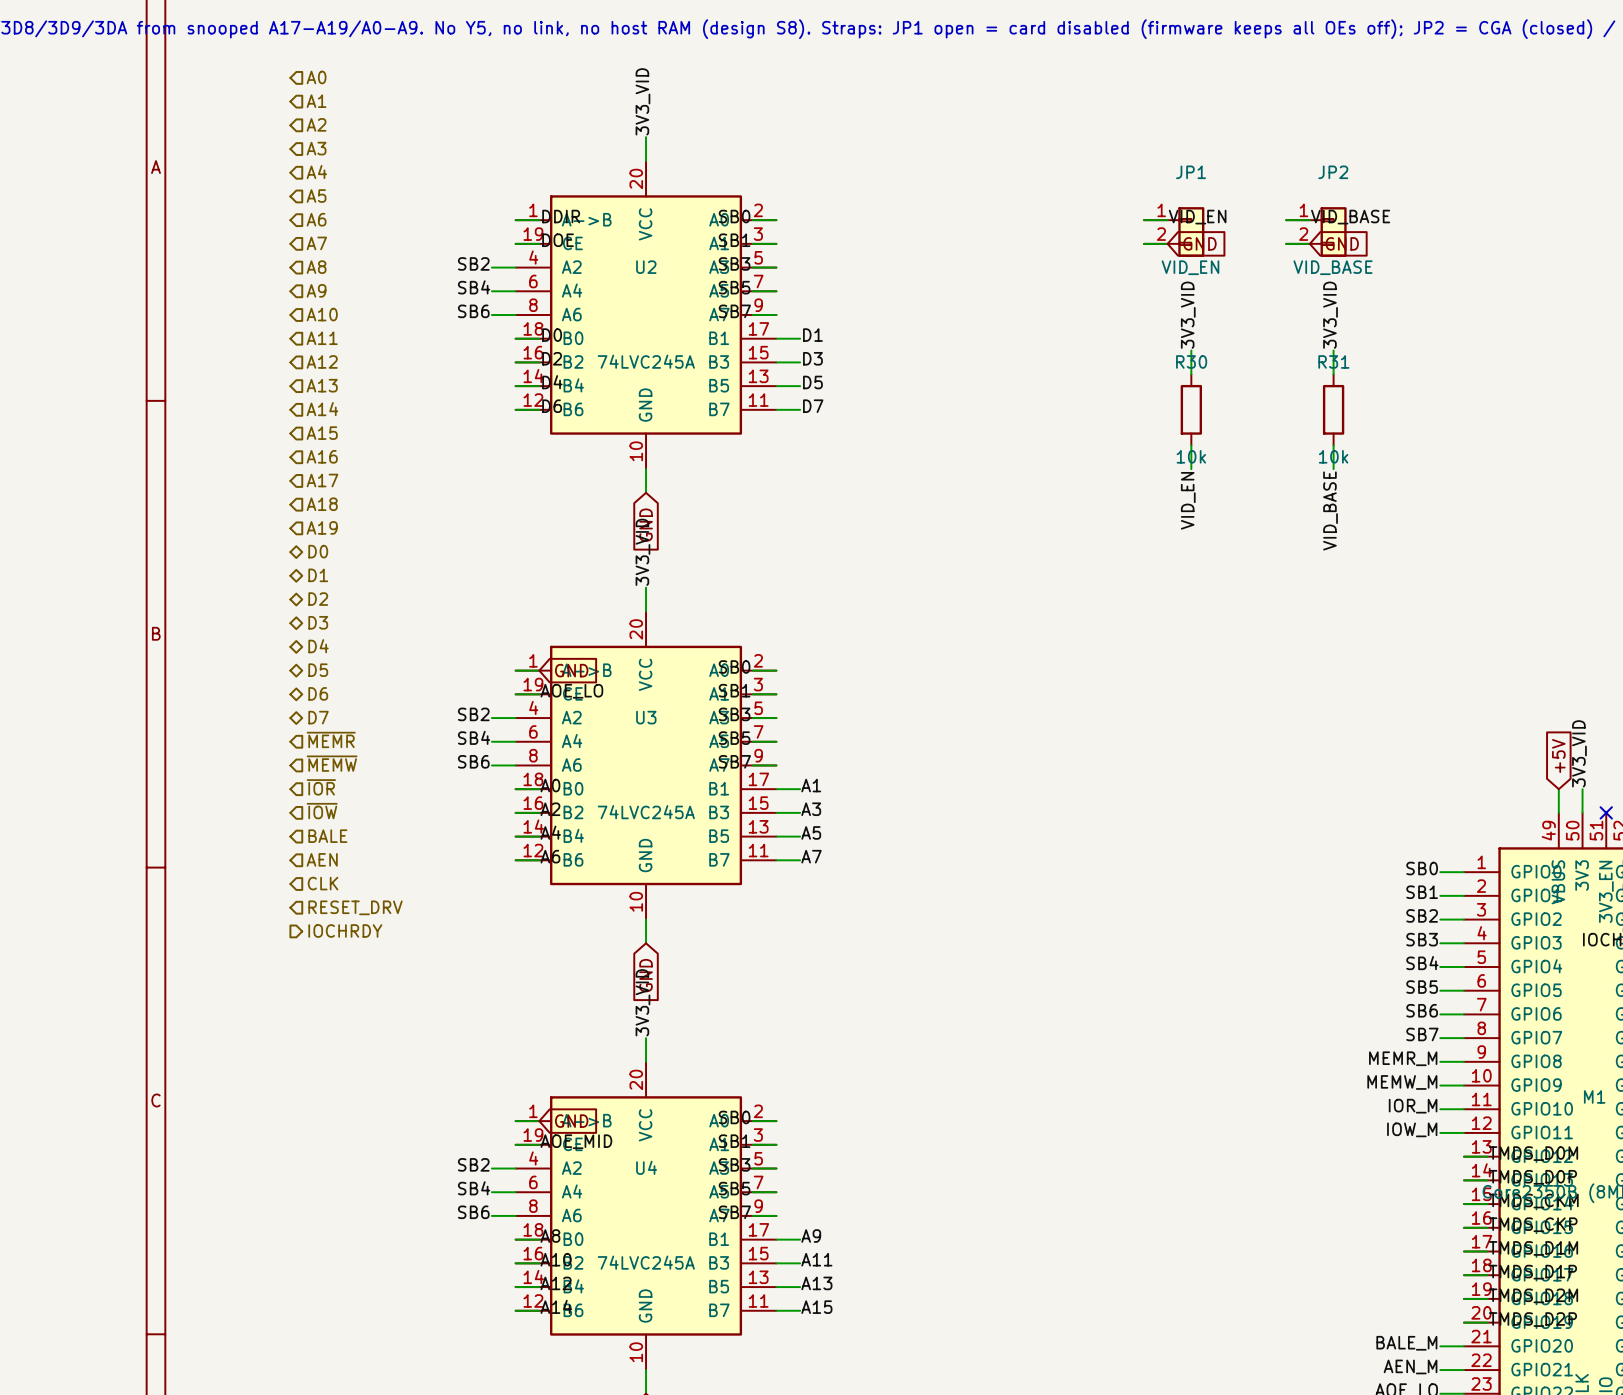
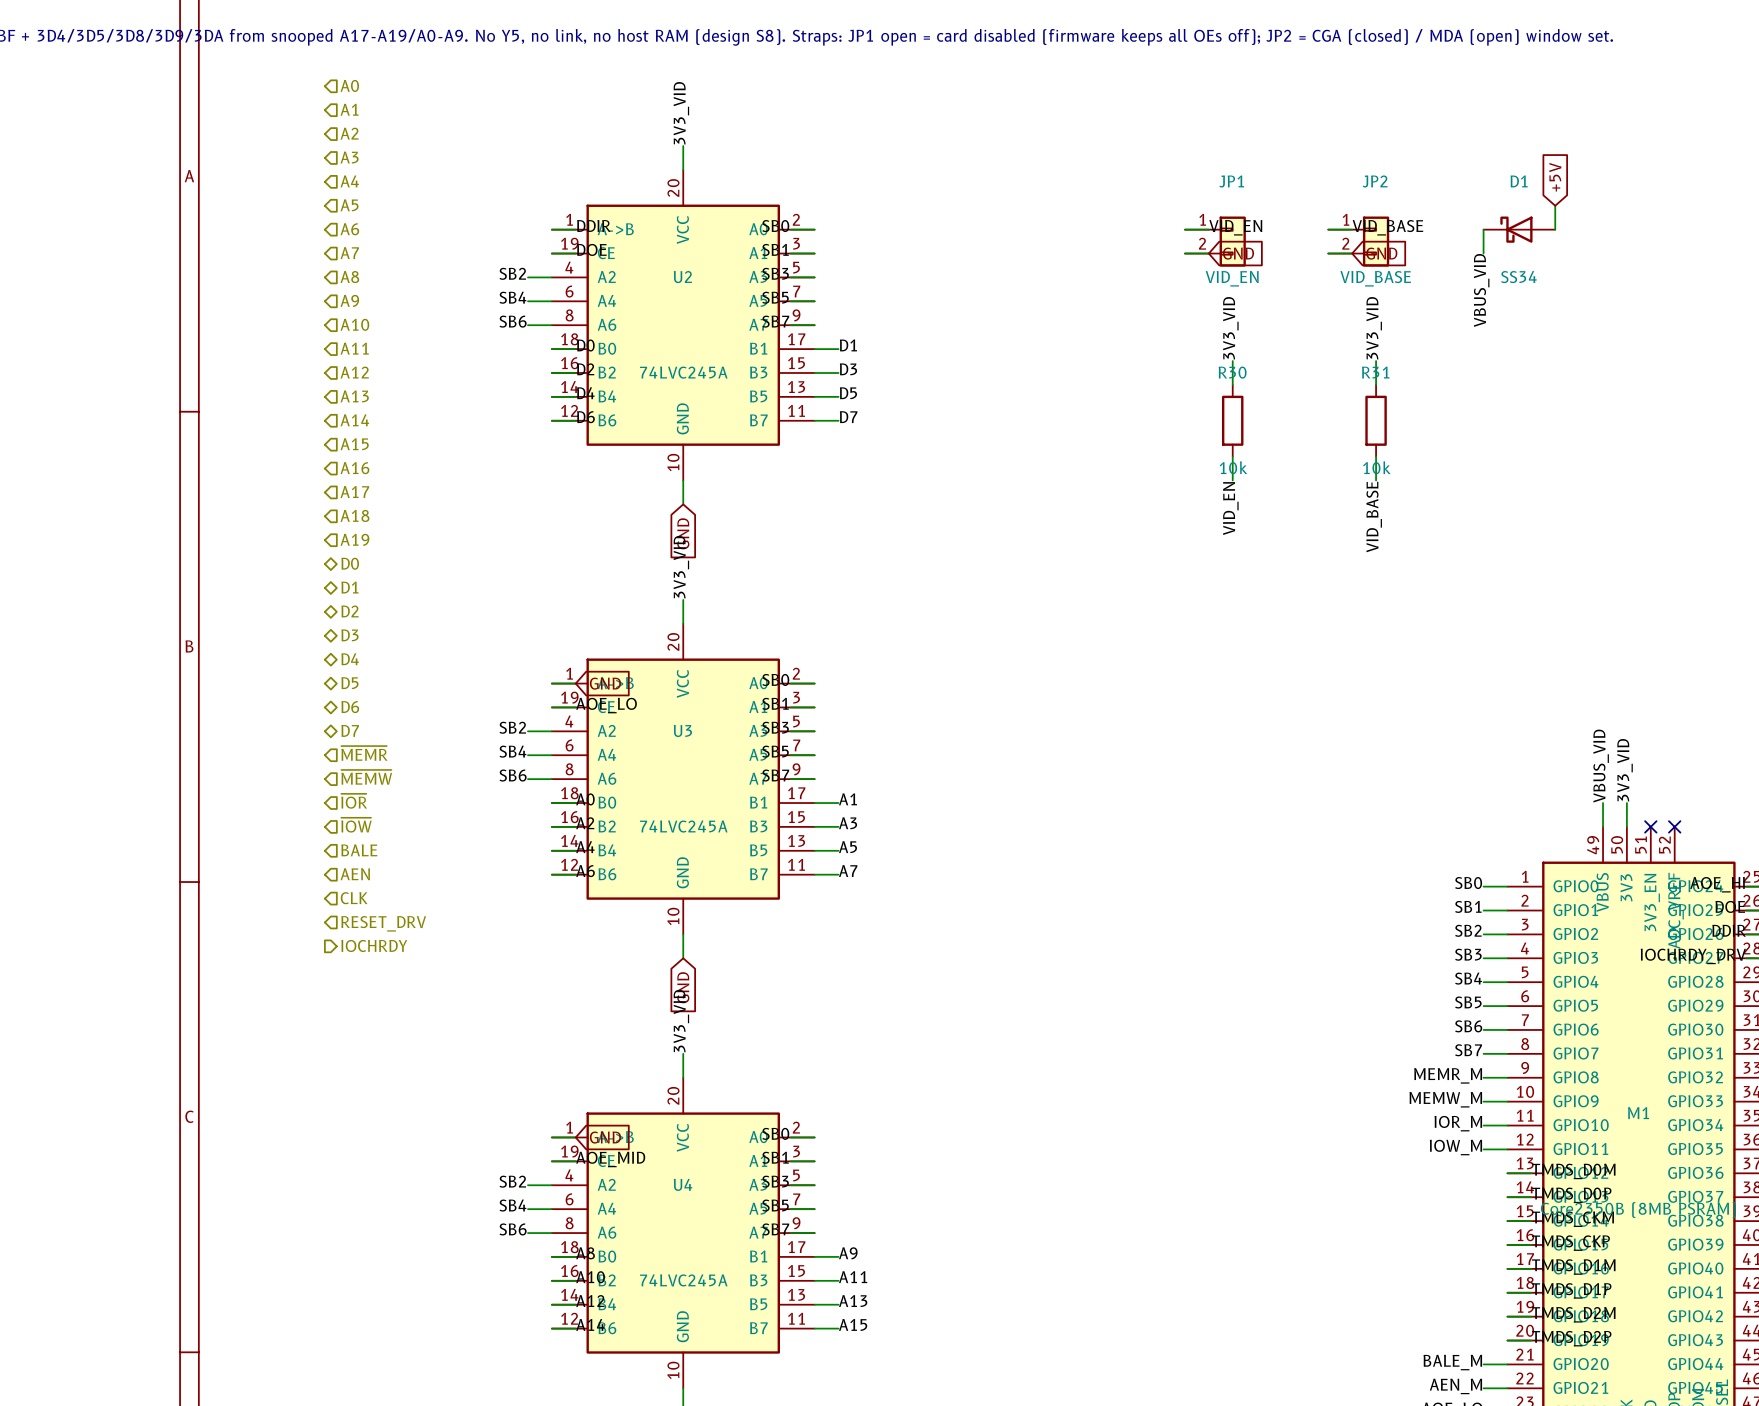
global label: none -> +5V (1555, 177)
wire: none -> (1555, 205) (1555, 229)
wire: none -> (1483, 229) (1483, 253)
D1: none -> SS34 (1519, 229)
label: none -> VBUS_VID (1481, 290)
label: none -> VBUS_VID (1601, 766)
global label: +5V (1558, 755) -> none

